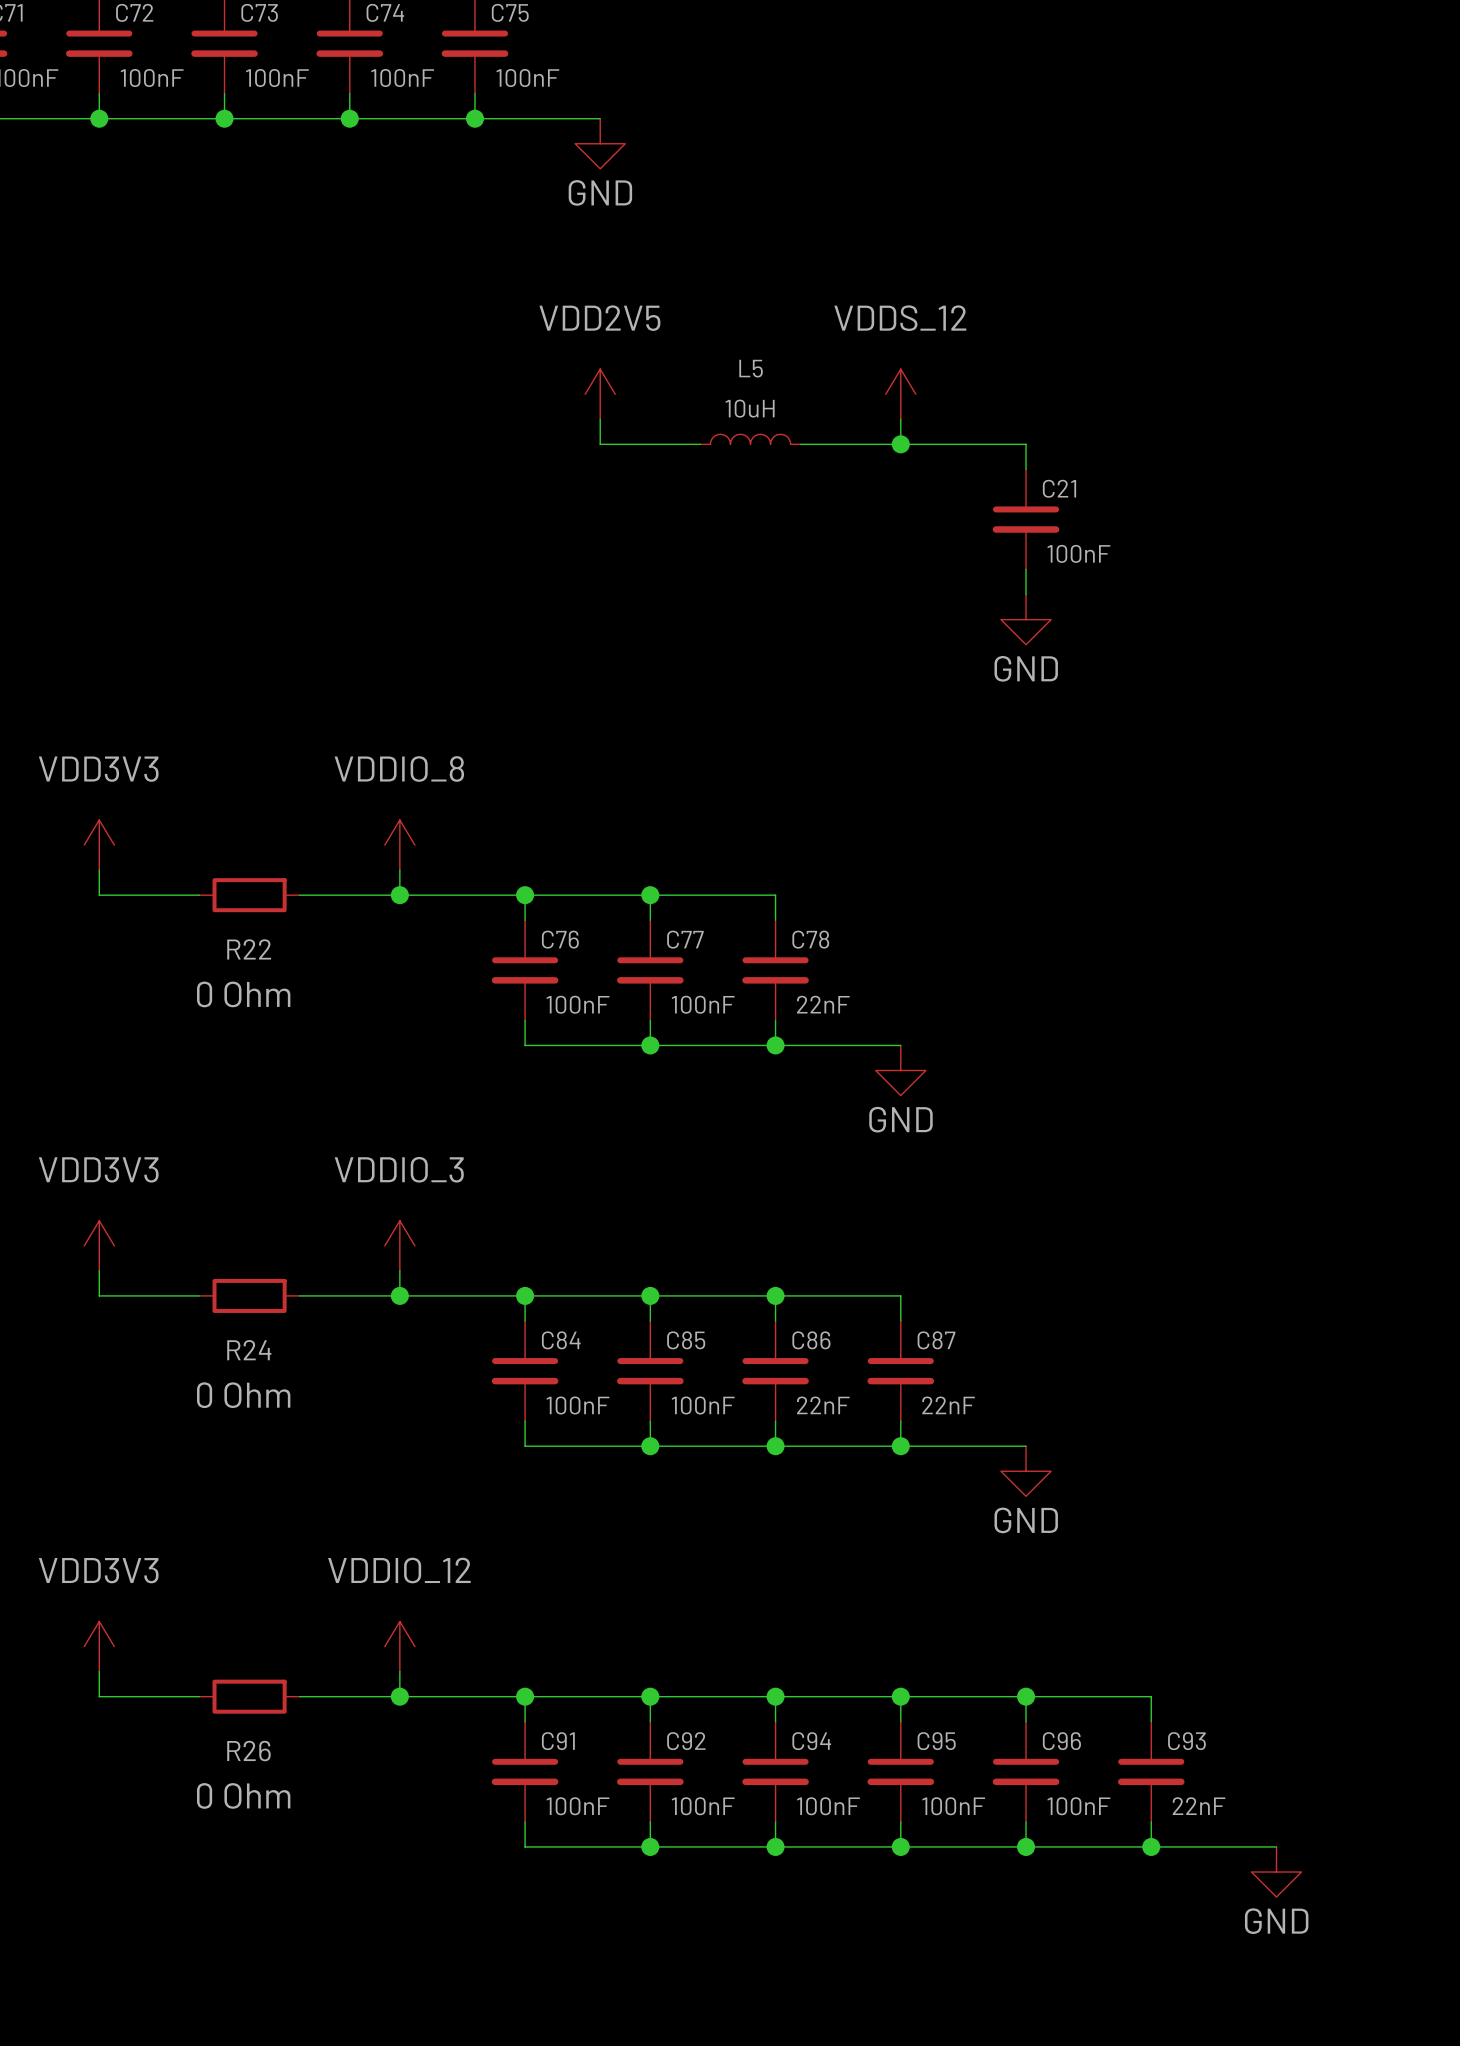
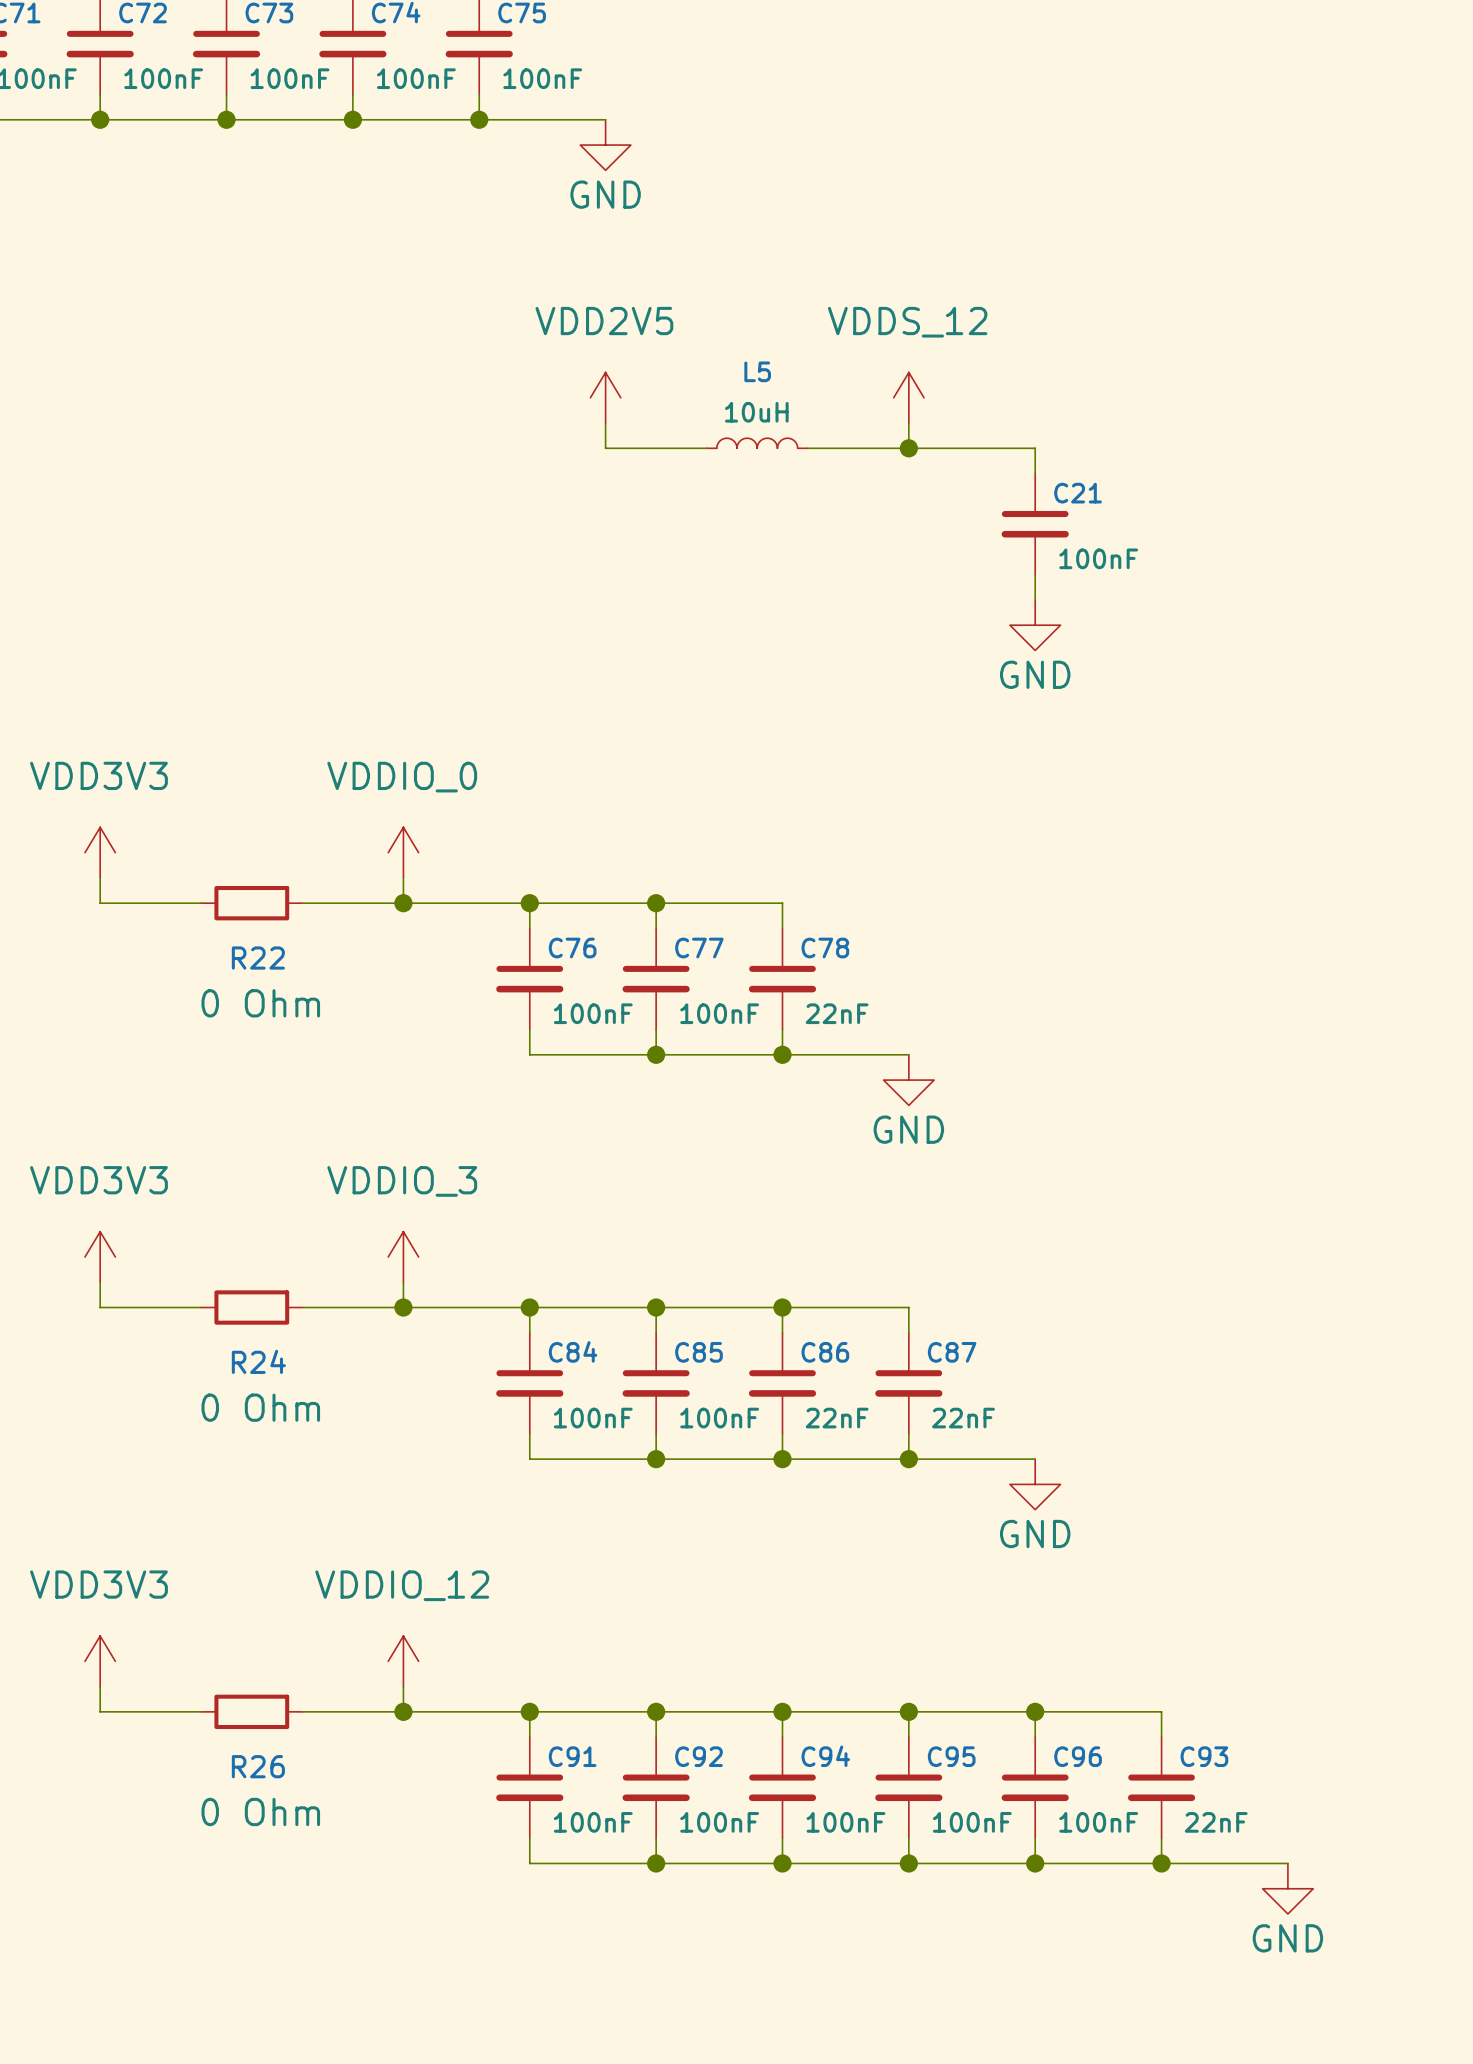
power symbol: VDDIO_8 (399, 845) -> VDDIO_0 (403, 852)

